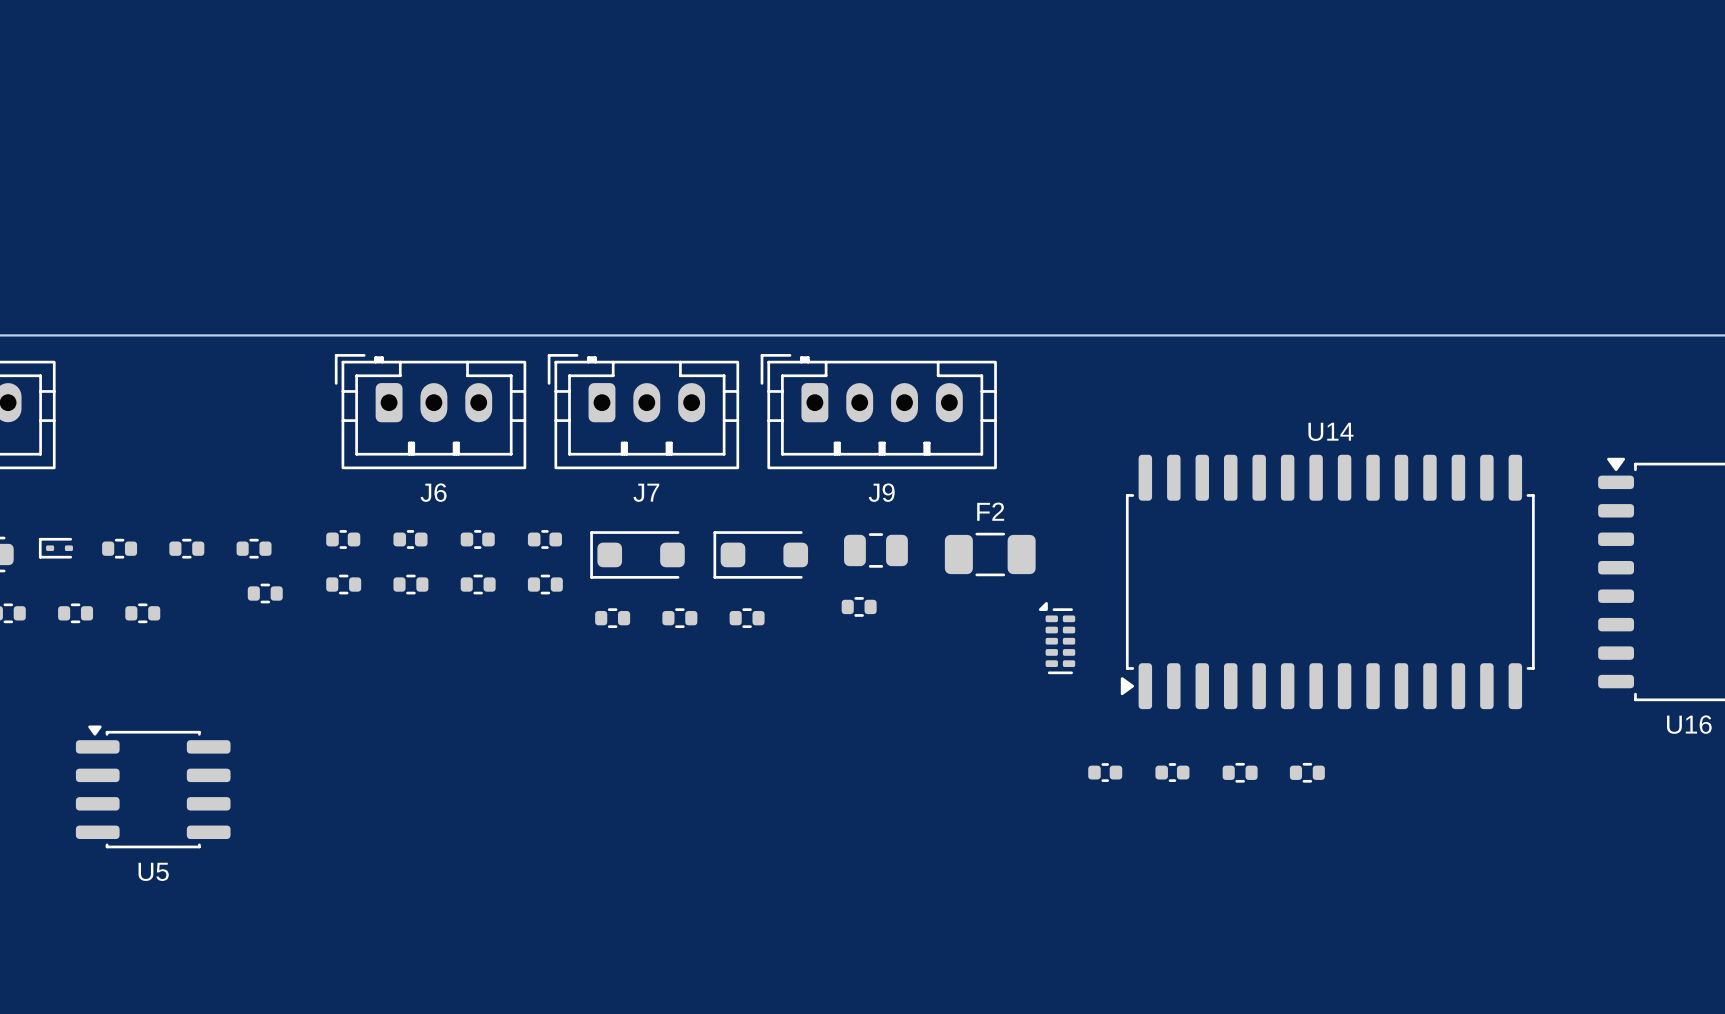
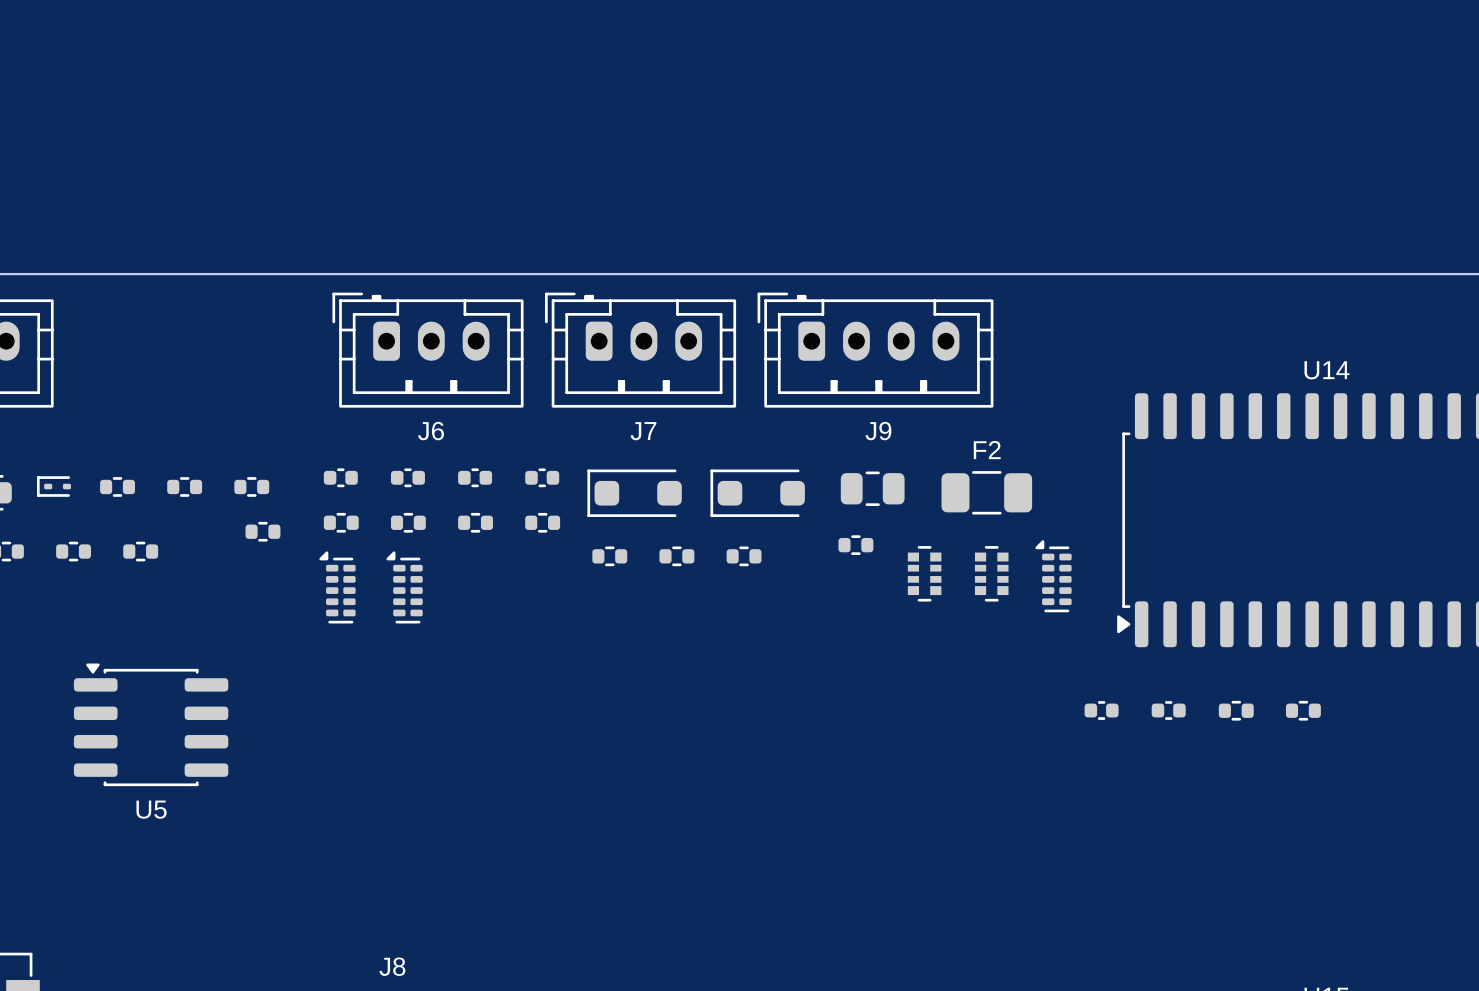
part: none -> (924, 573)
part: none -> (991, 573)
part: none -> (337, 587)
part: none -> (404, 587)

